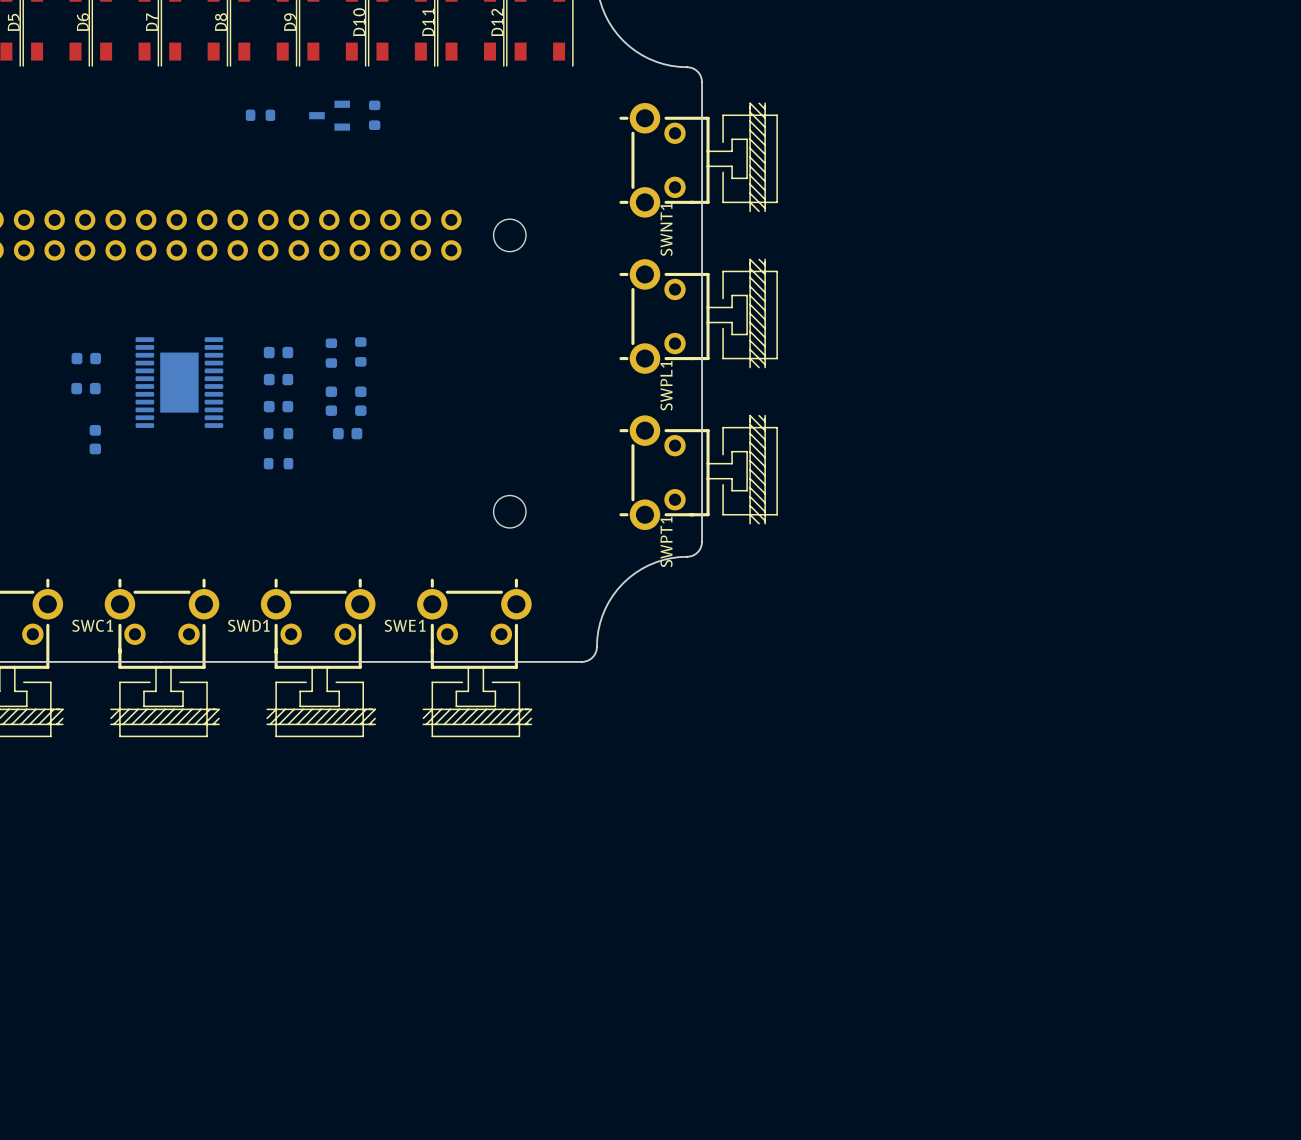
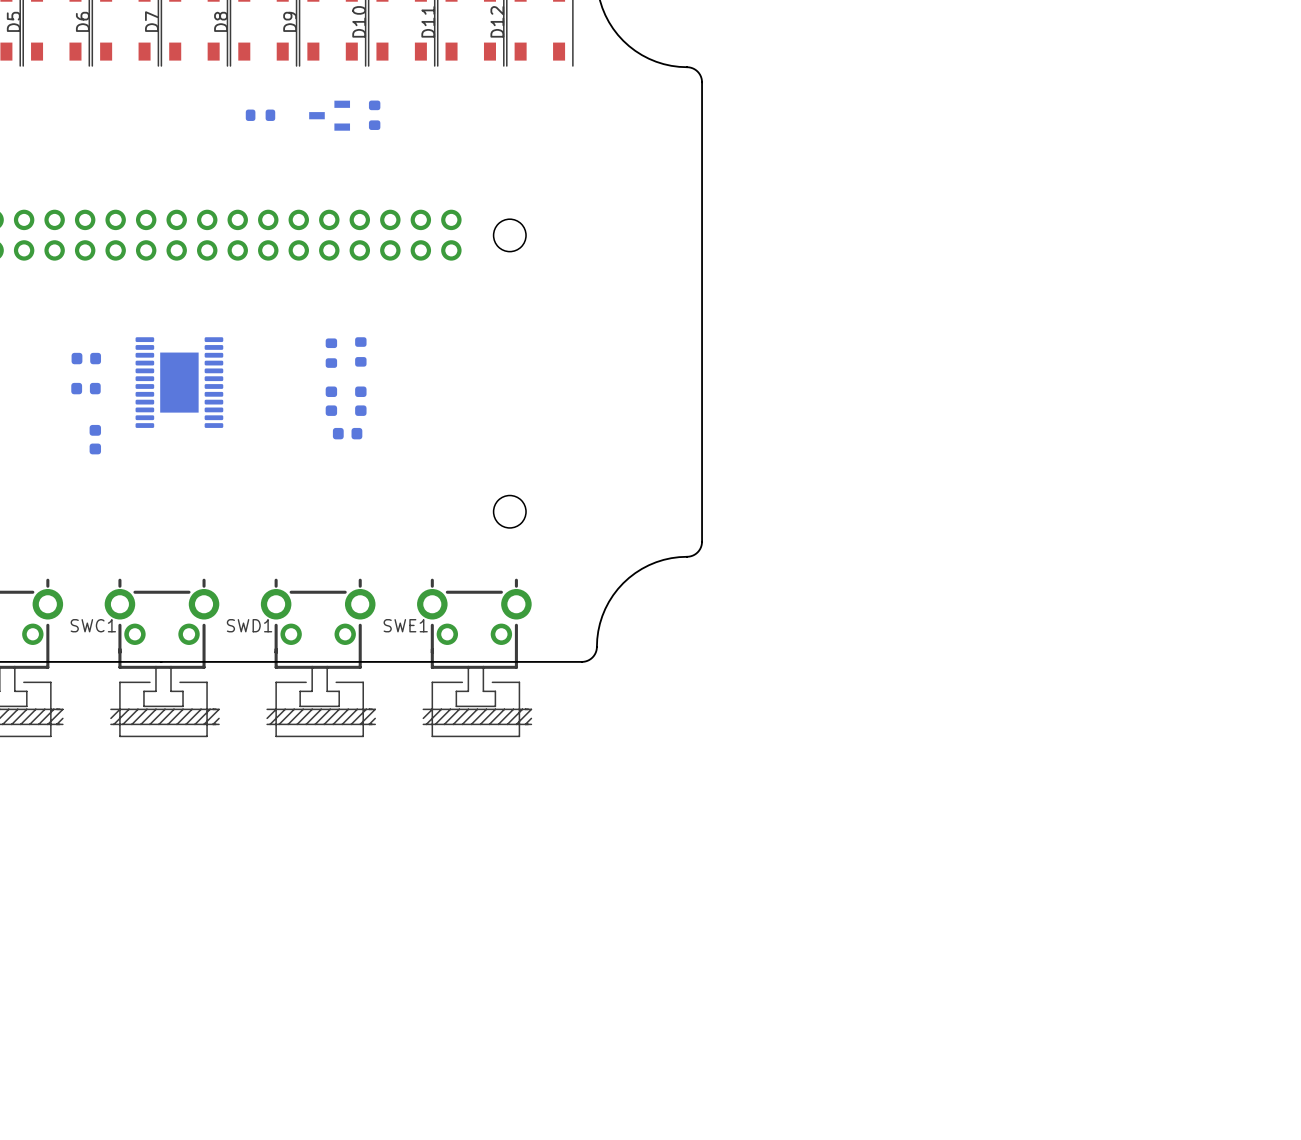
SWNT1: (698, 160) -> none
SWPL1: (698, 316) -> none
part: (278, 352) -> none
part: (278, 379) -> none
part: (278, 406) -> none
part: (278, 433) -> none
part: (278, 463) -> none
SWPT1: (698, 472) -> none

